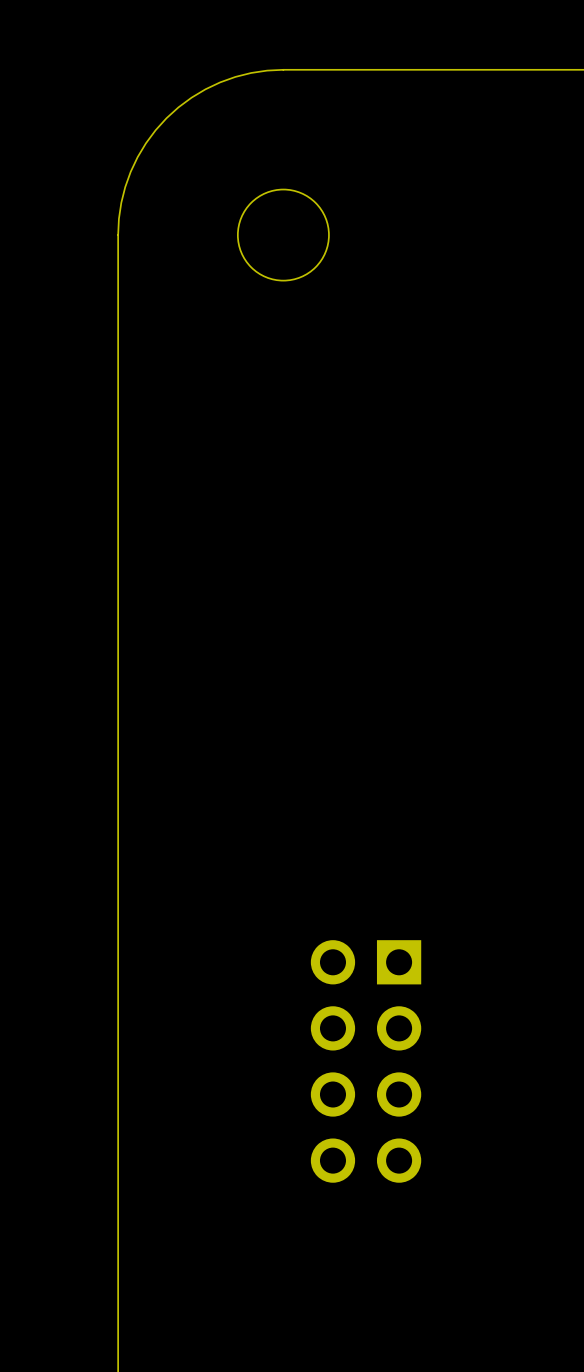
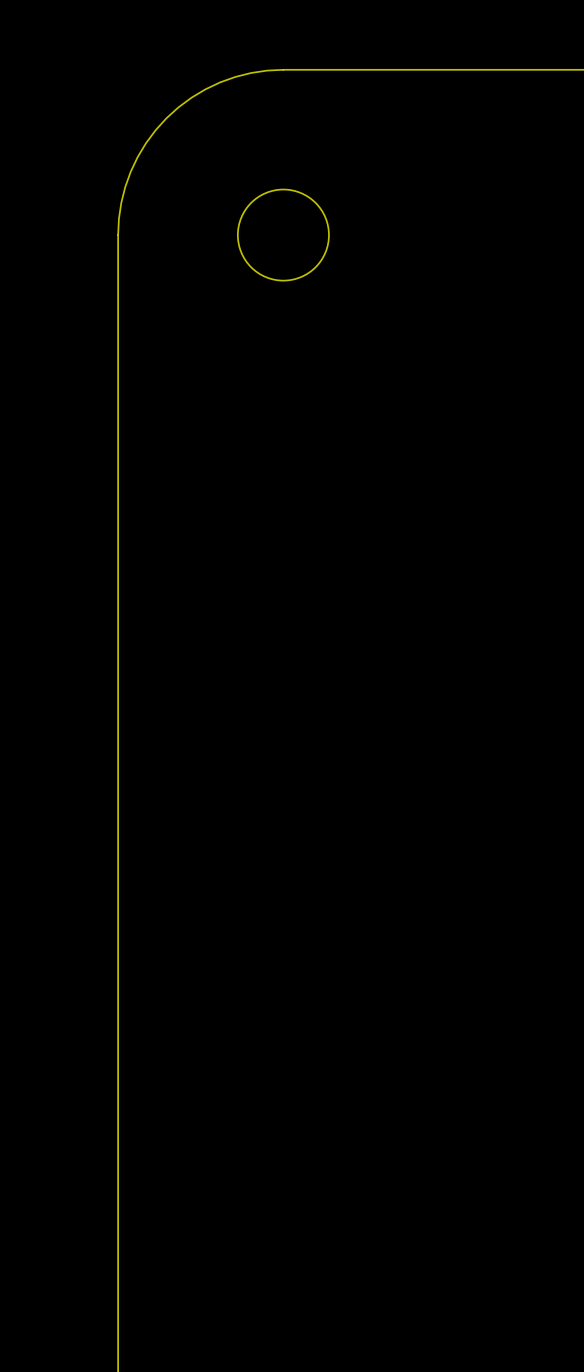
part: (366, 1061) -> none

